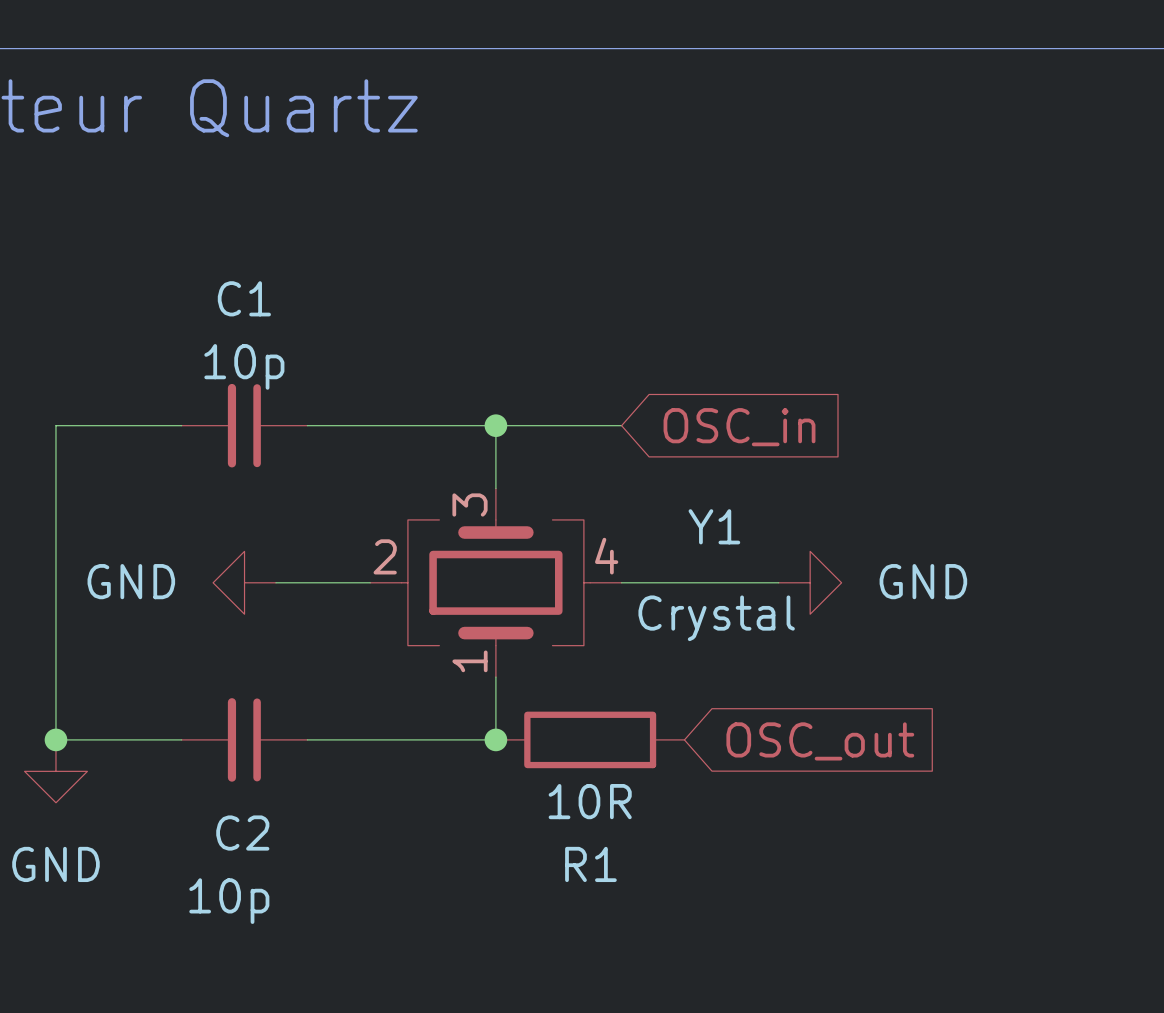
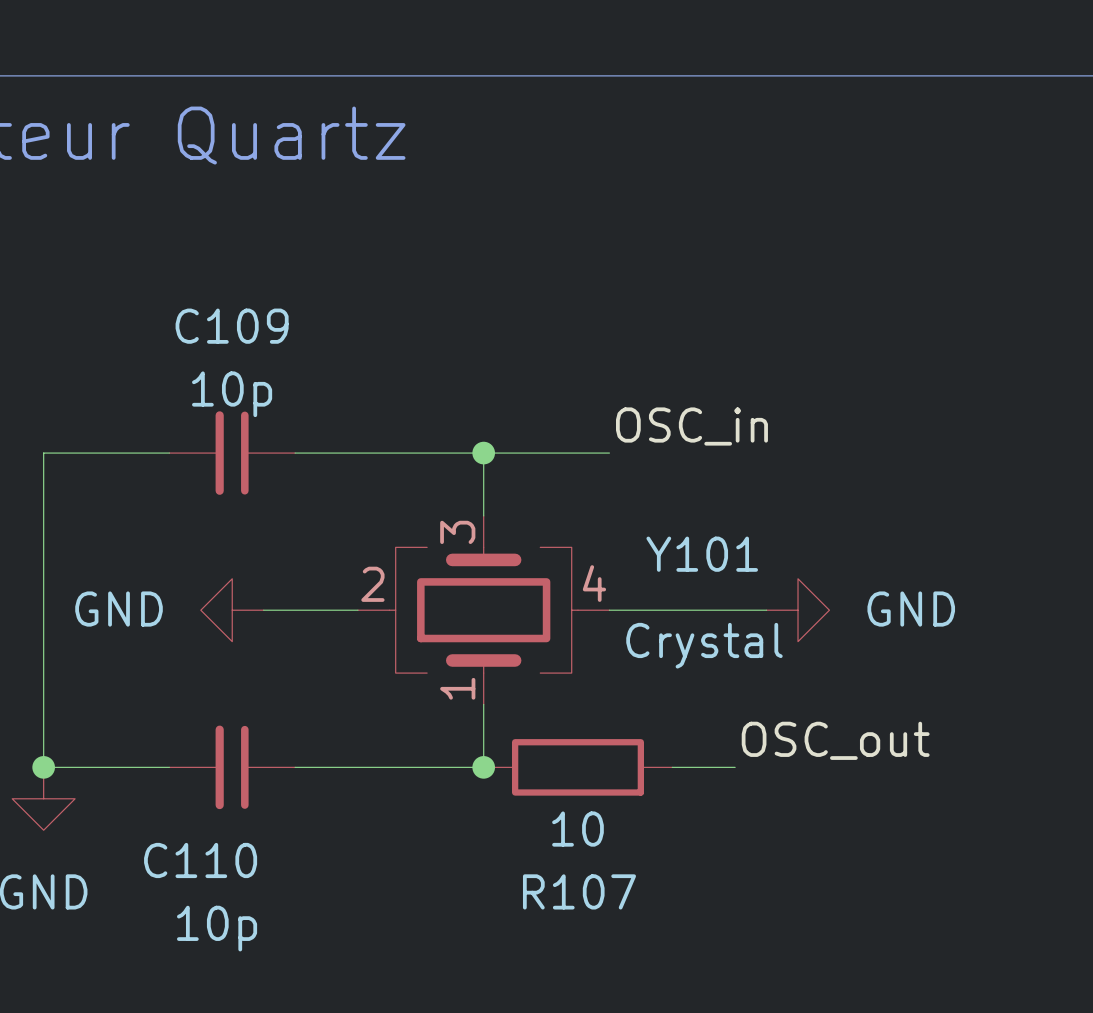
C1 name: C1 (244, 298) -> C109 (232, 326)
label: none -> OSC_in (691, 426)
global label: OSC_in (739, 427) -> none
Y1 name: Y1 (714, 526) -> Y101 (702, 554)
label: none -> OSC_out (835, 740)
wire: none -> (672, 767) (735, 767)
global label: OSC_out (820, 741) -> none
R1 value: 10R (590, 801) -> 10 (577, 829)
C2 name: C2 (242, 833) -> C110 (200, 860)
R1 name: R1 (590, 864) -> R107 (579, 891)

